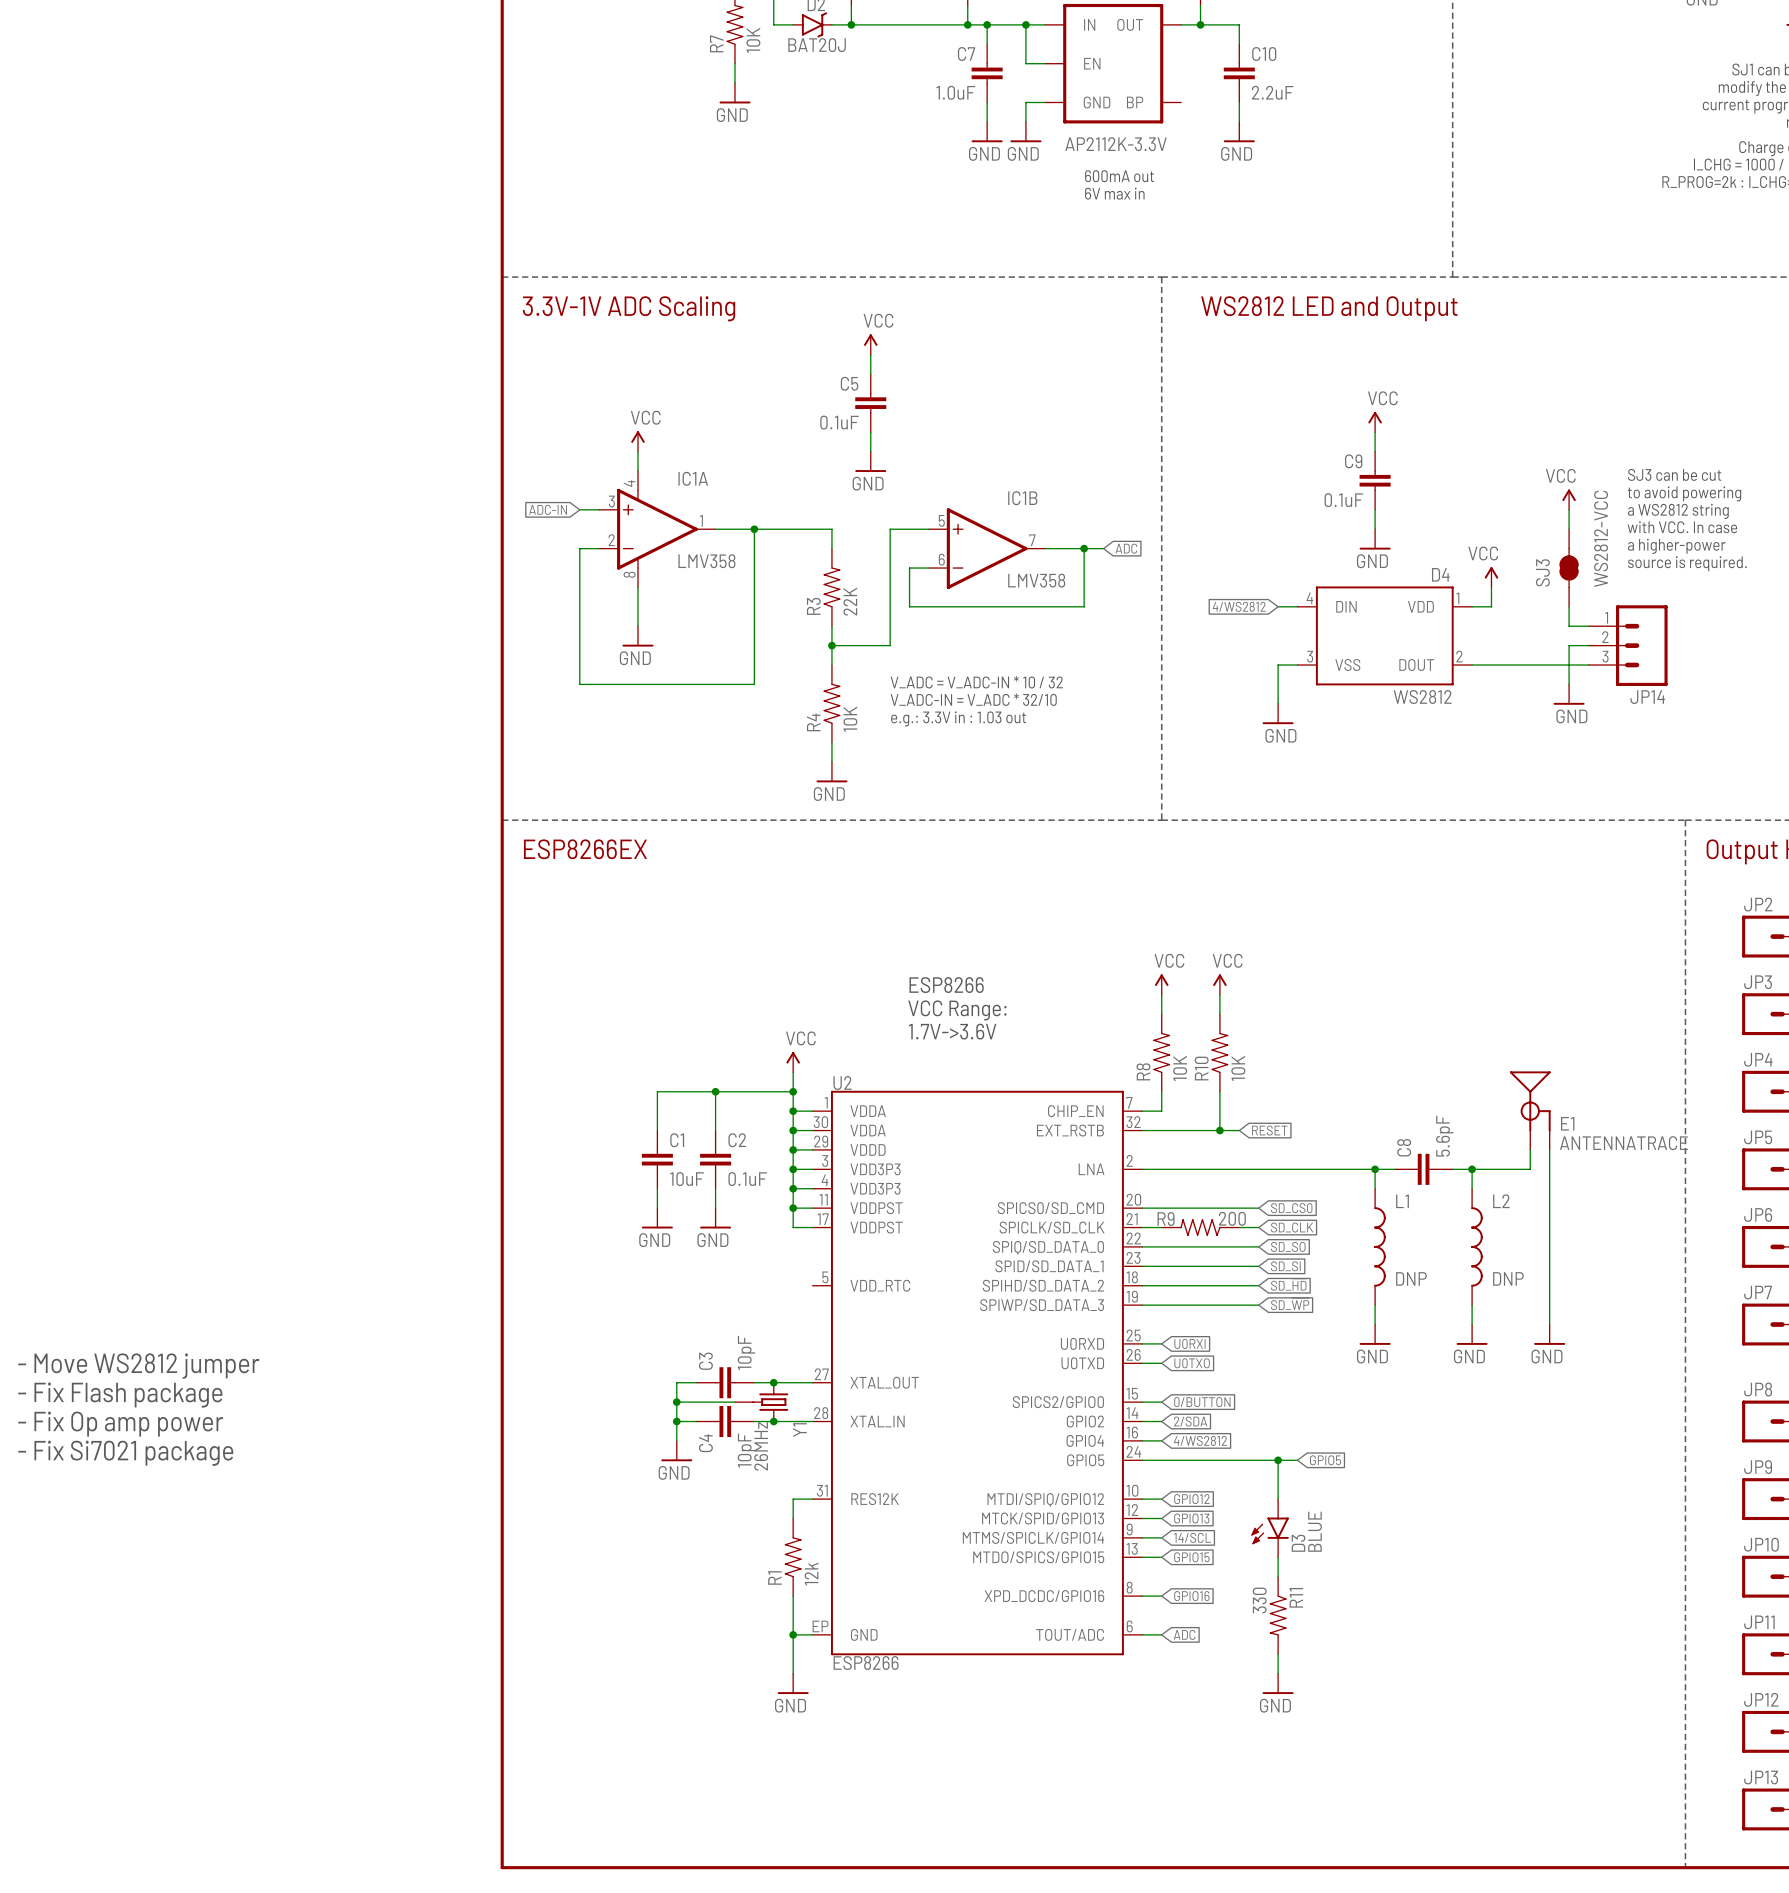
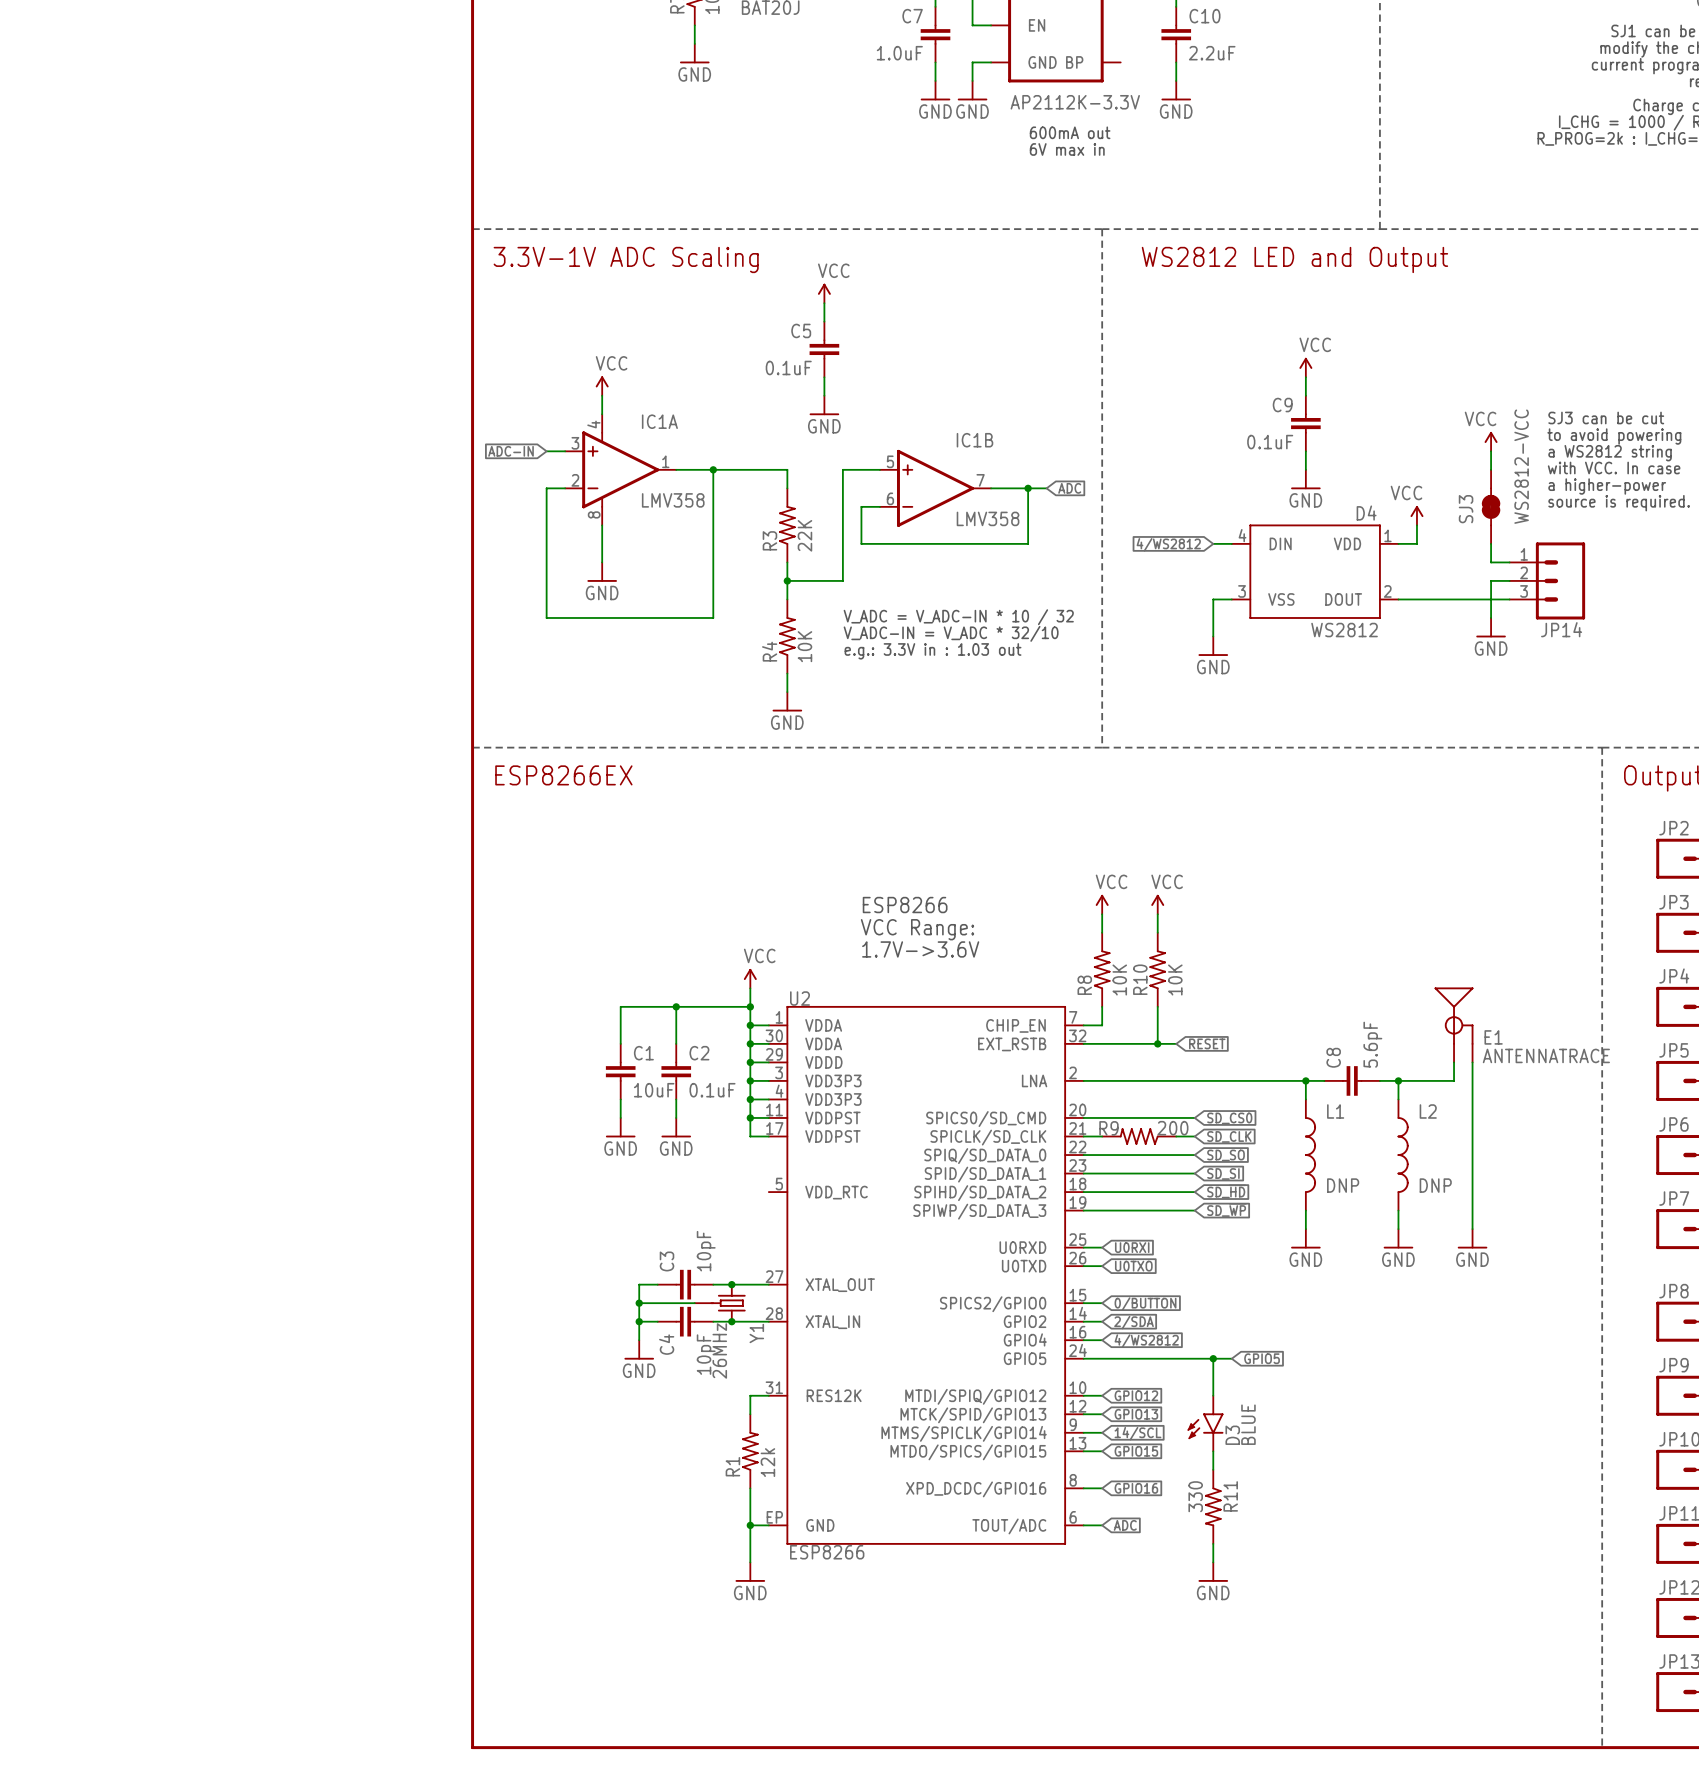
text: - Move WS2812 jumper (138, 1366) -> none
text: - Fix Flash package (120, 1395) -> none
text: - Fix Op amp power (120, 1424) -> none
text: - Fix Si7021 package (125, 1453) -> none

